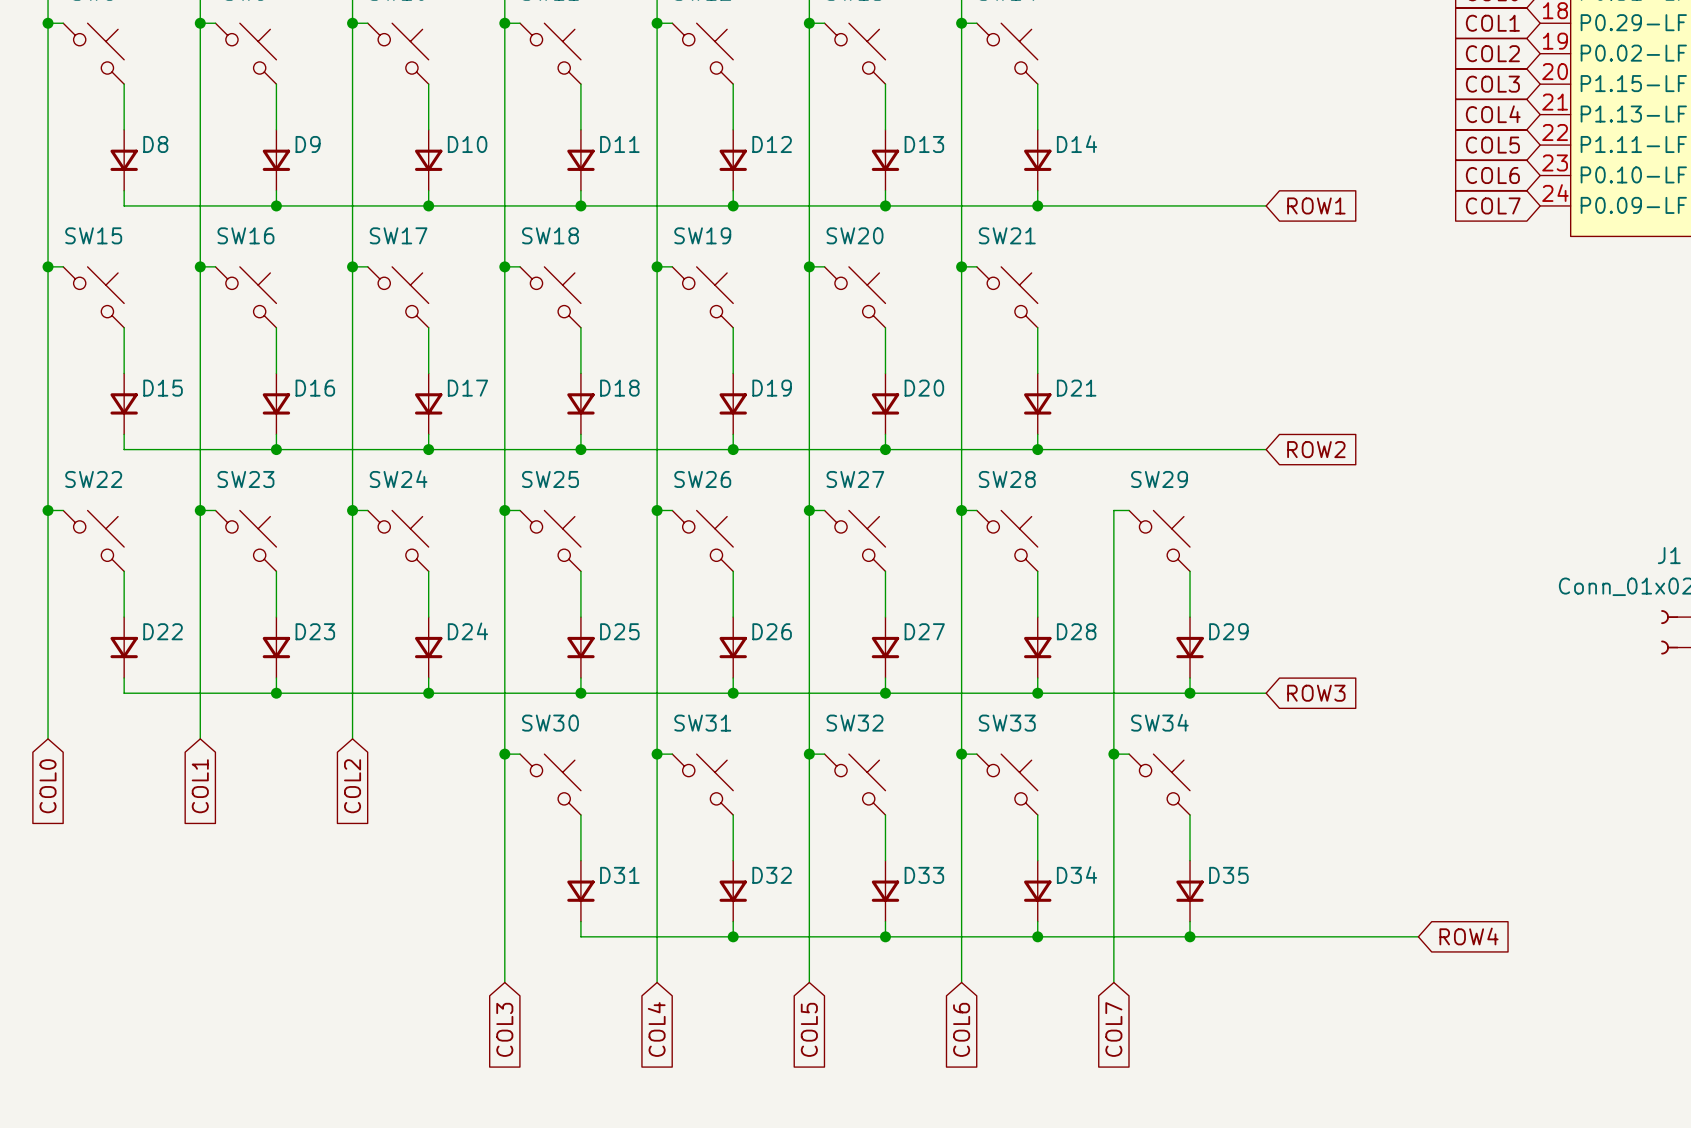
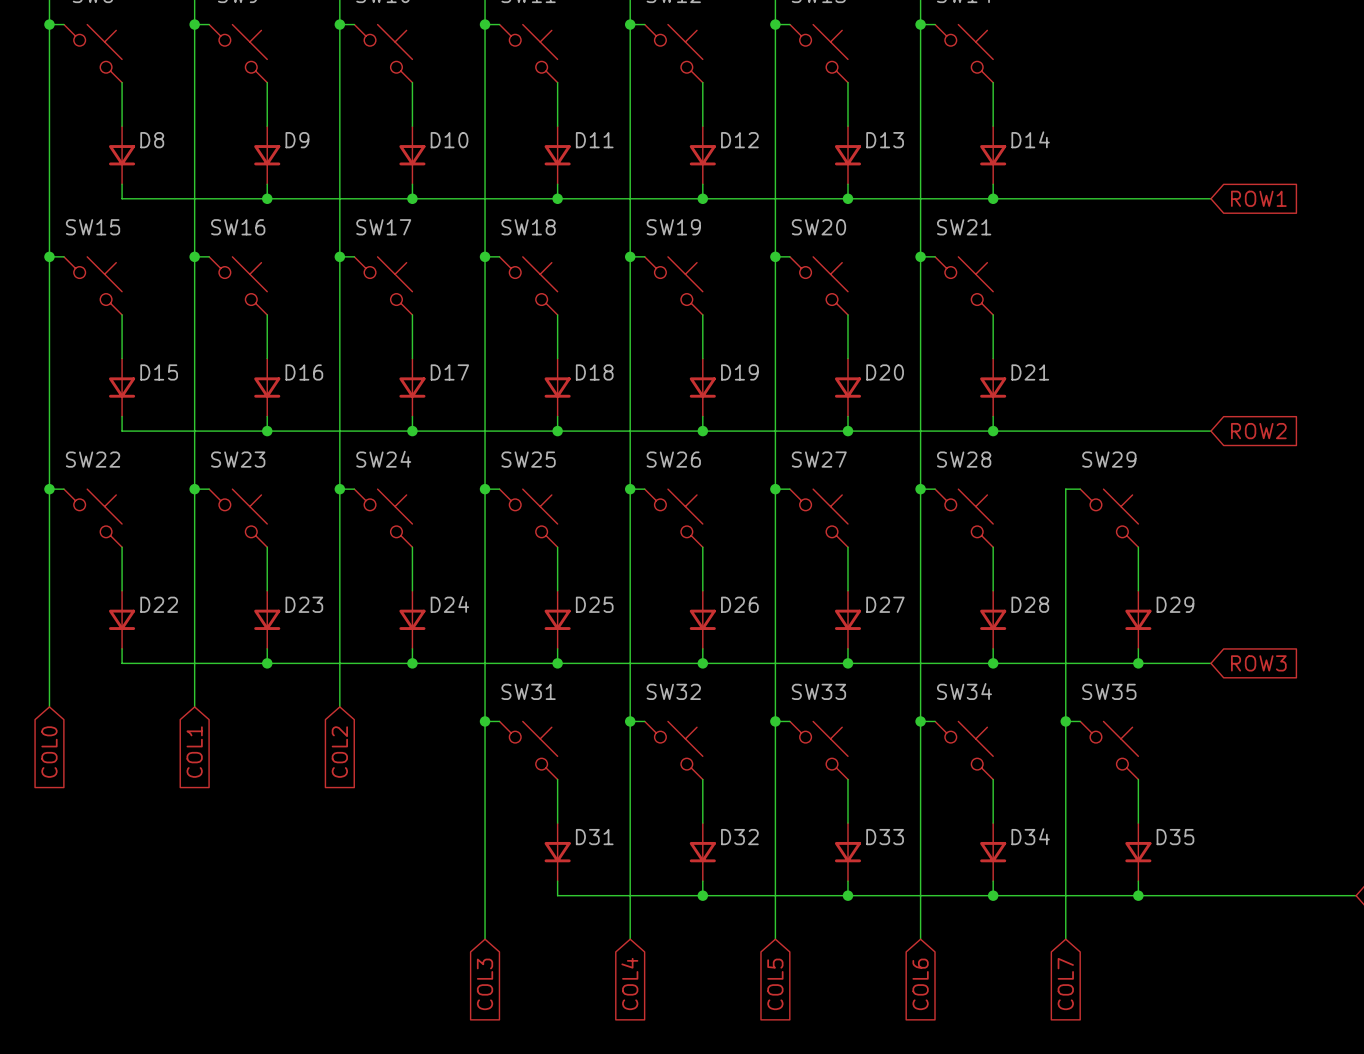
SW34 name: SW34 (1159, 722) -> SW35 (1109, 691)
SW30 name: SW30 (550, 723) -> SW31 (528, 691)
SW31 name: SW31 (702, 723) -> SW32 (673, 691)
SW32 name: SW32 (855, 723) -> SW33 (818, 691)
SW33 name: SW33 (1007, 723) -> SW34 (964, 691)

